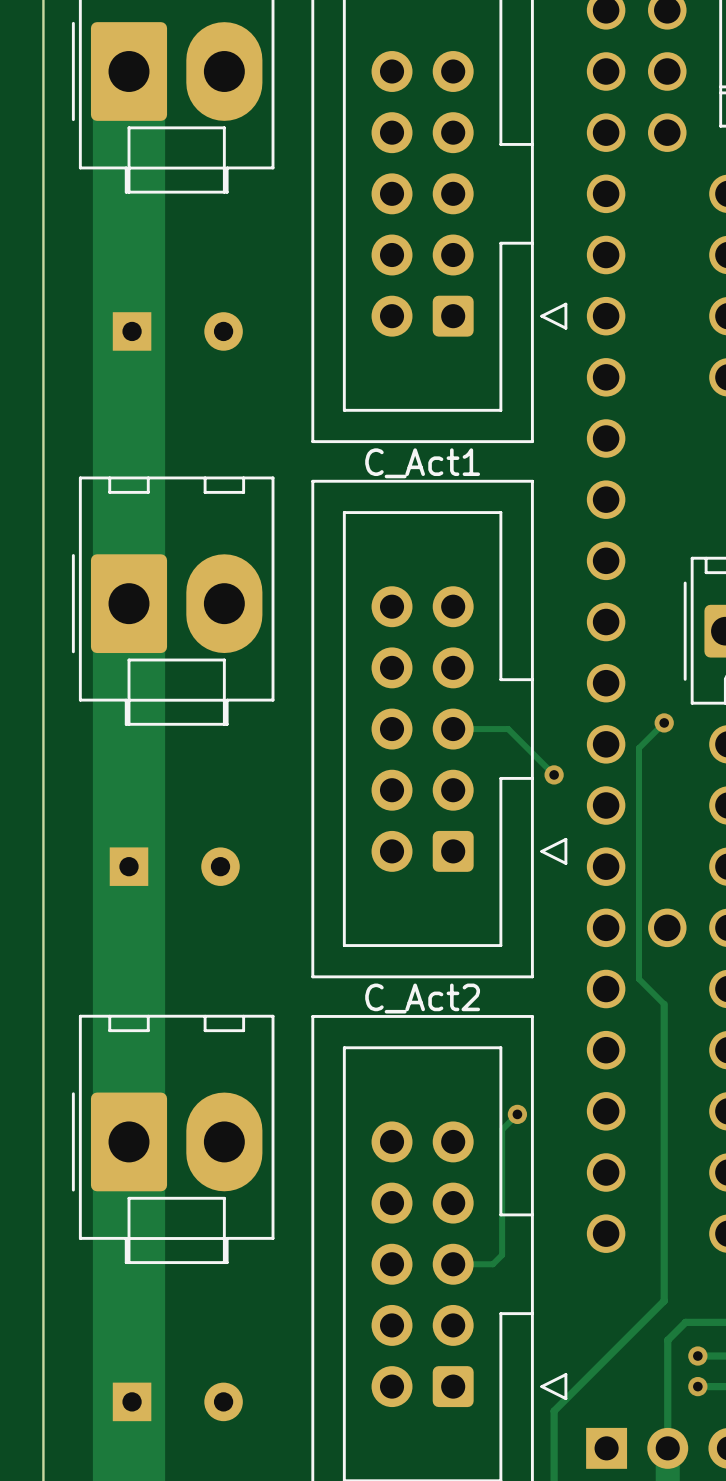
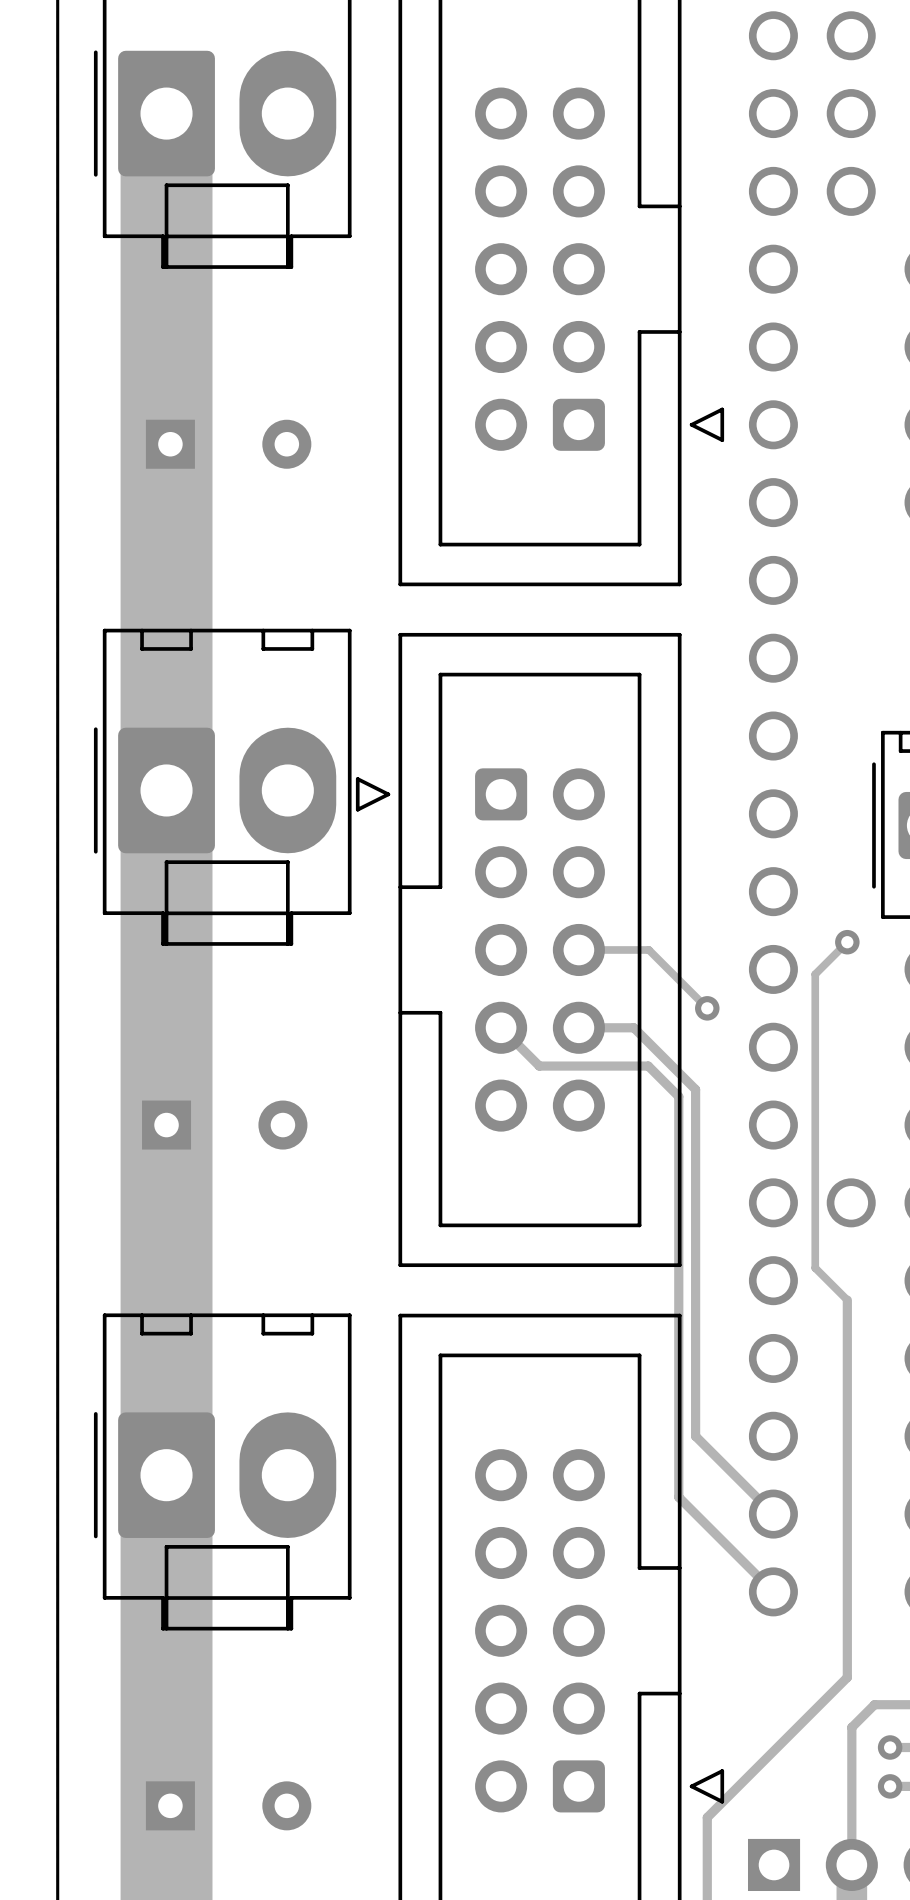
C_Act1 name: C_Act1 (422, 463) -> none
part: none -> (518, 949)
C_Act2: (439, 729) -> none
track: none -> (501, 1027) (539, 1066) (648, 1066) (678, 1096) (678, 1497) (773, 1591)
track: none -> (578, 1027) (633, 1027) (695, 1089) (695, 1436) (773, 1514)
track: (517, 1114) (502, 1129) (502, 1255) (492, 1264) (453, 1264) -> none
via: (517, 1114) -> none

